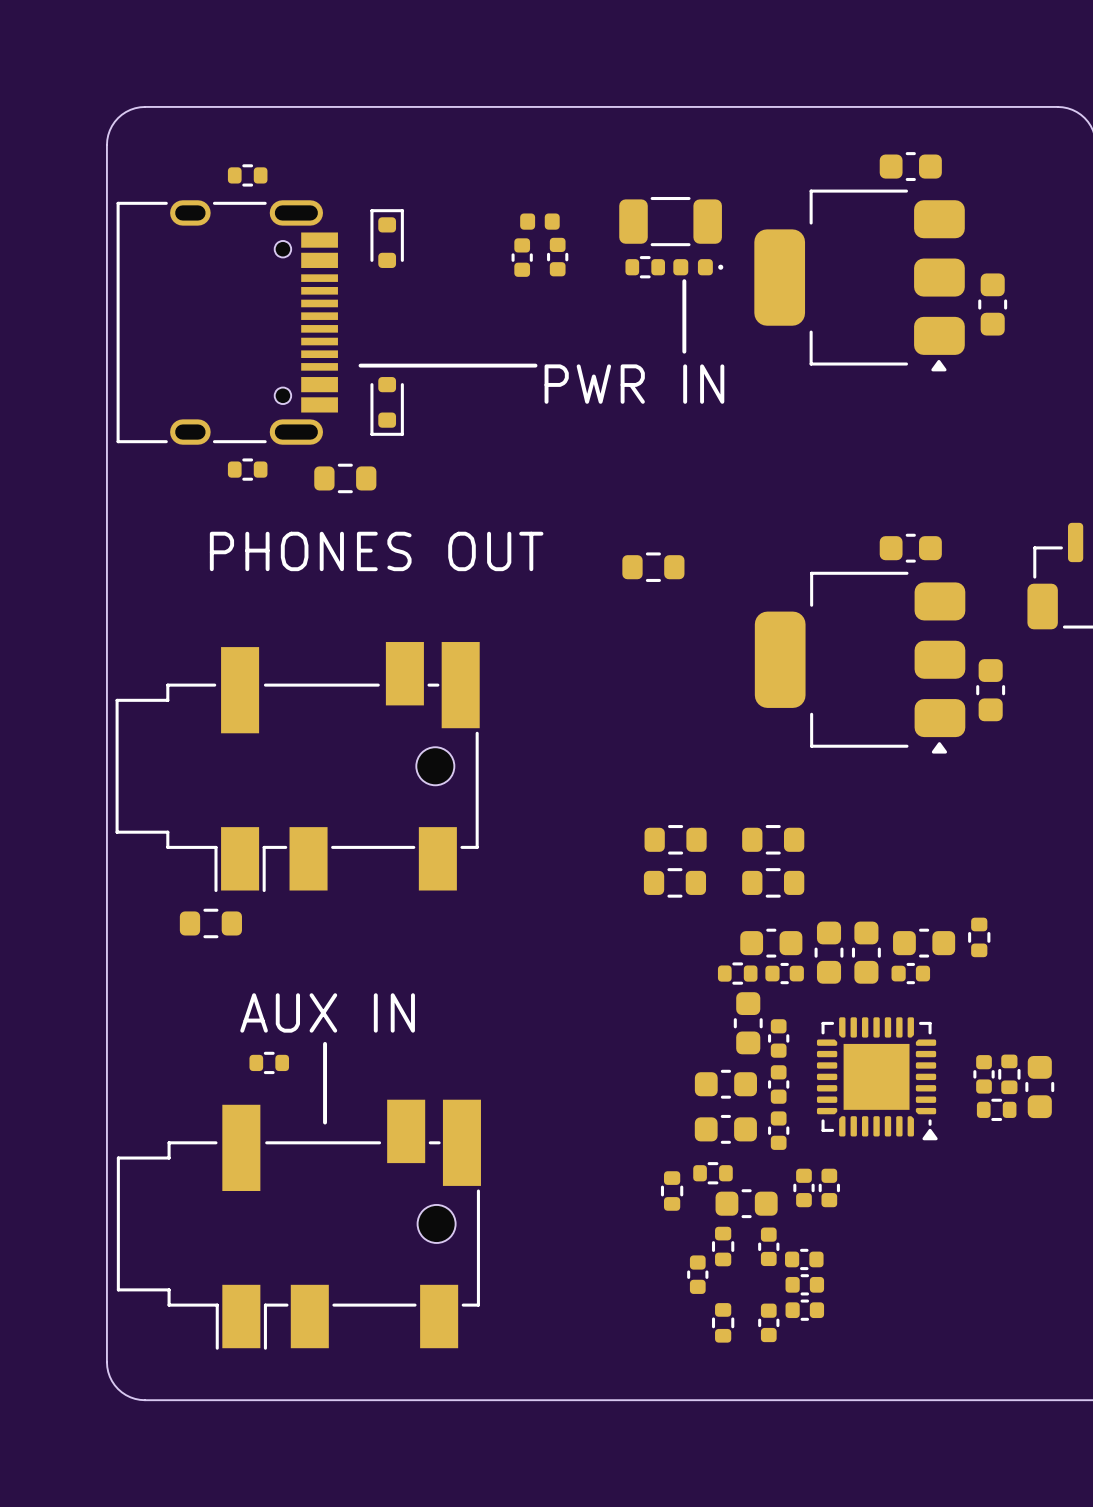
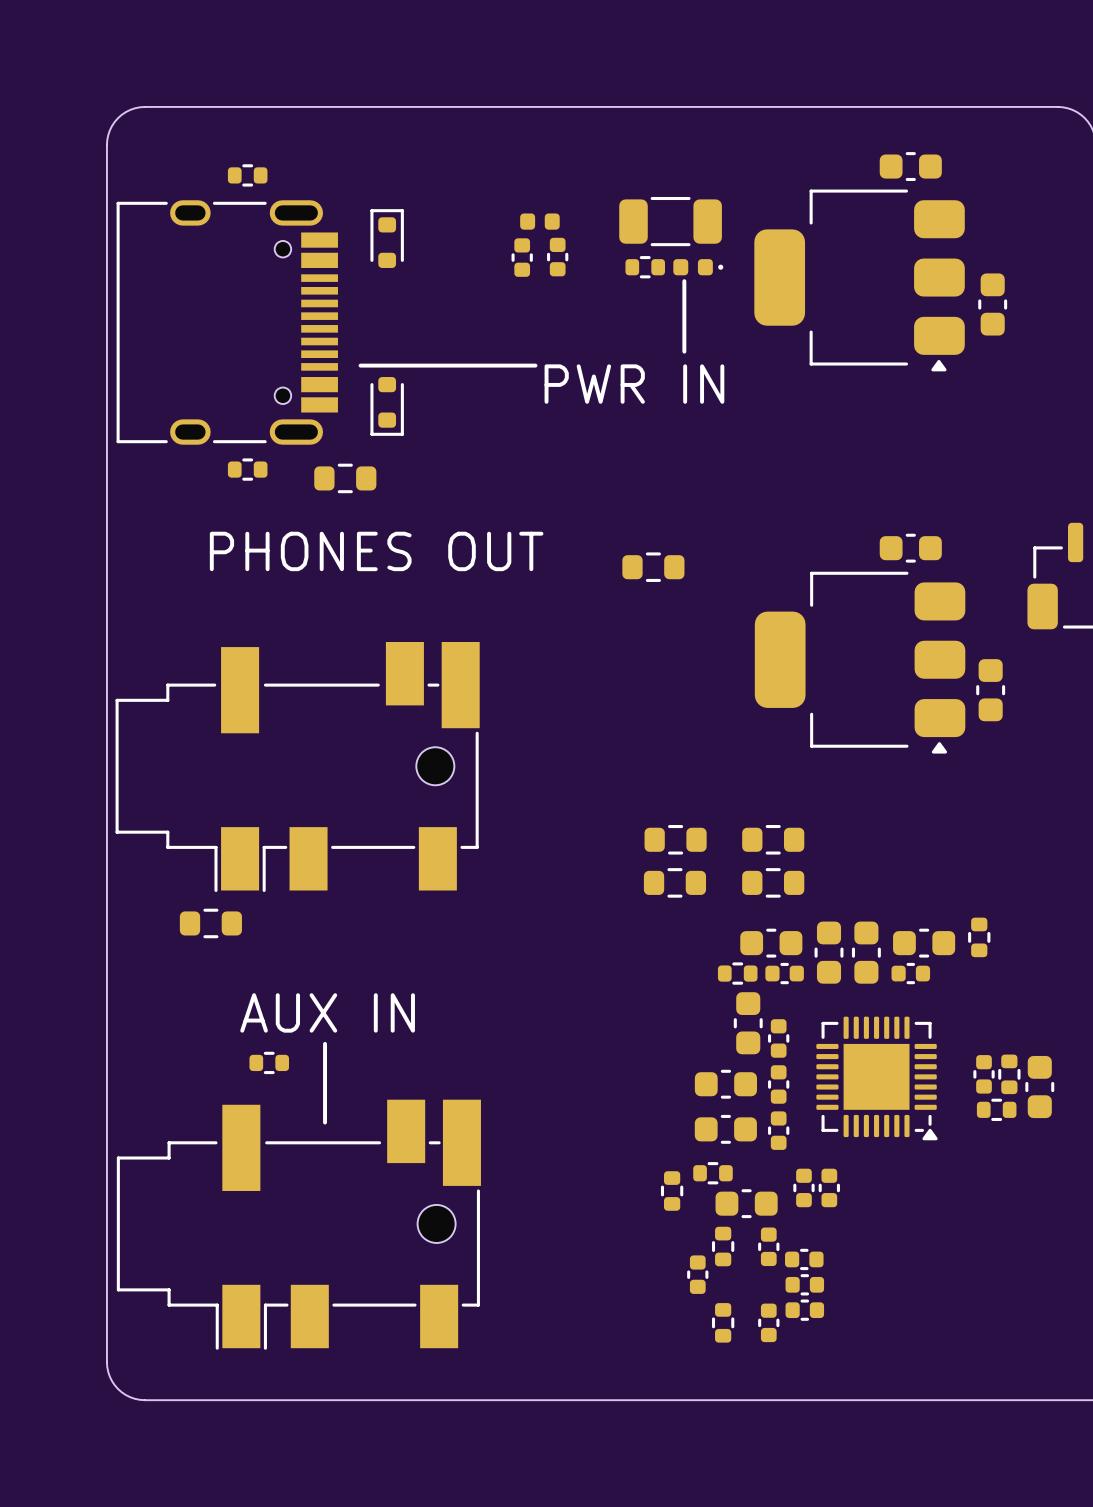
part footprint: [816, 1017, 938, 1141] -> [816, 1016, 938, 1141]

